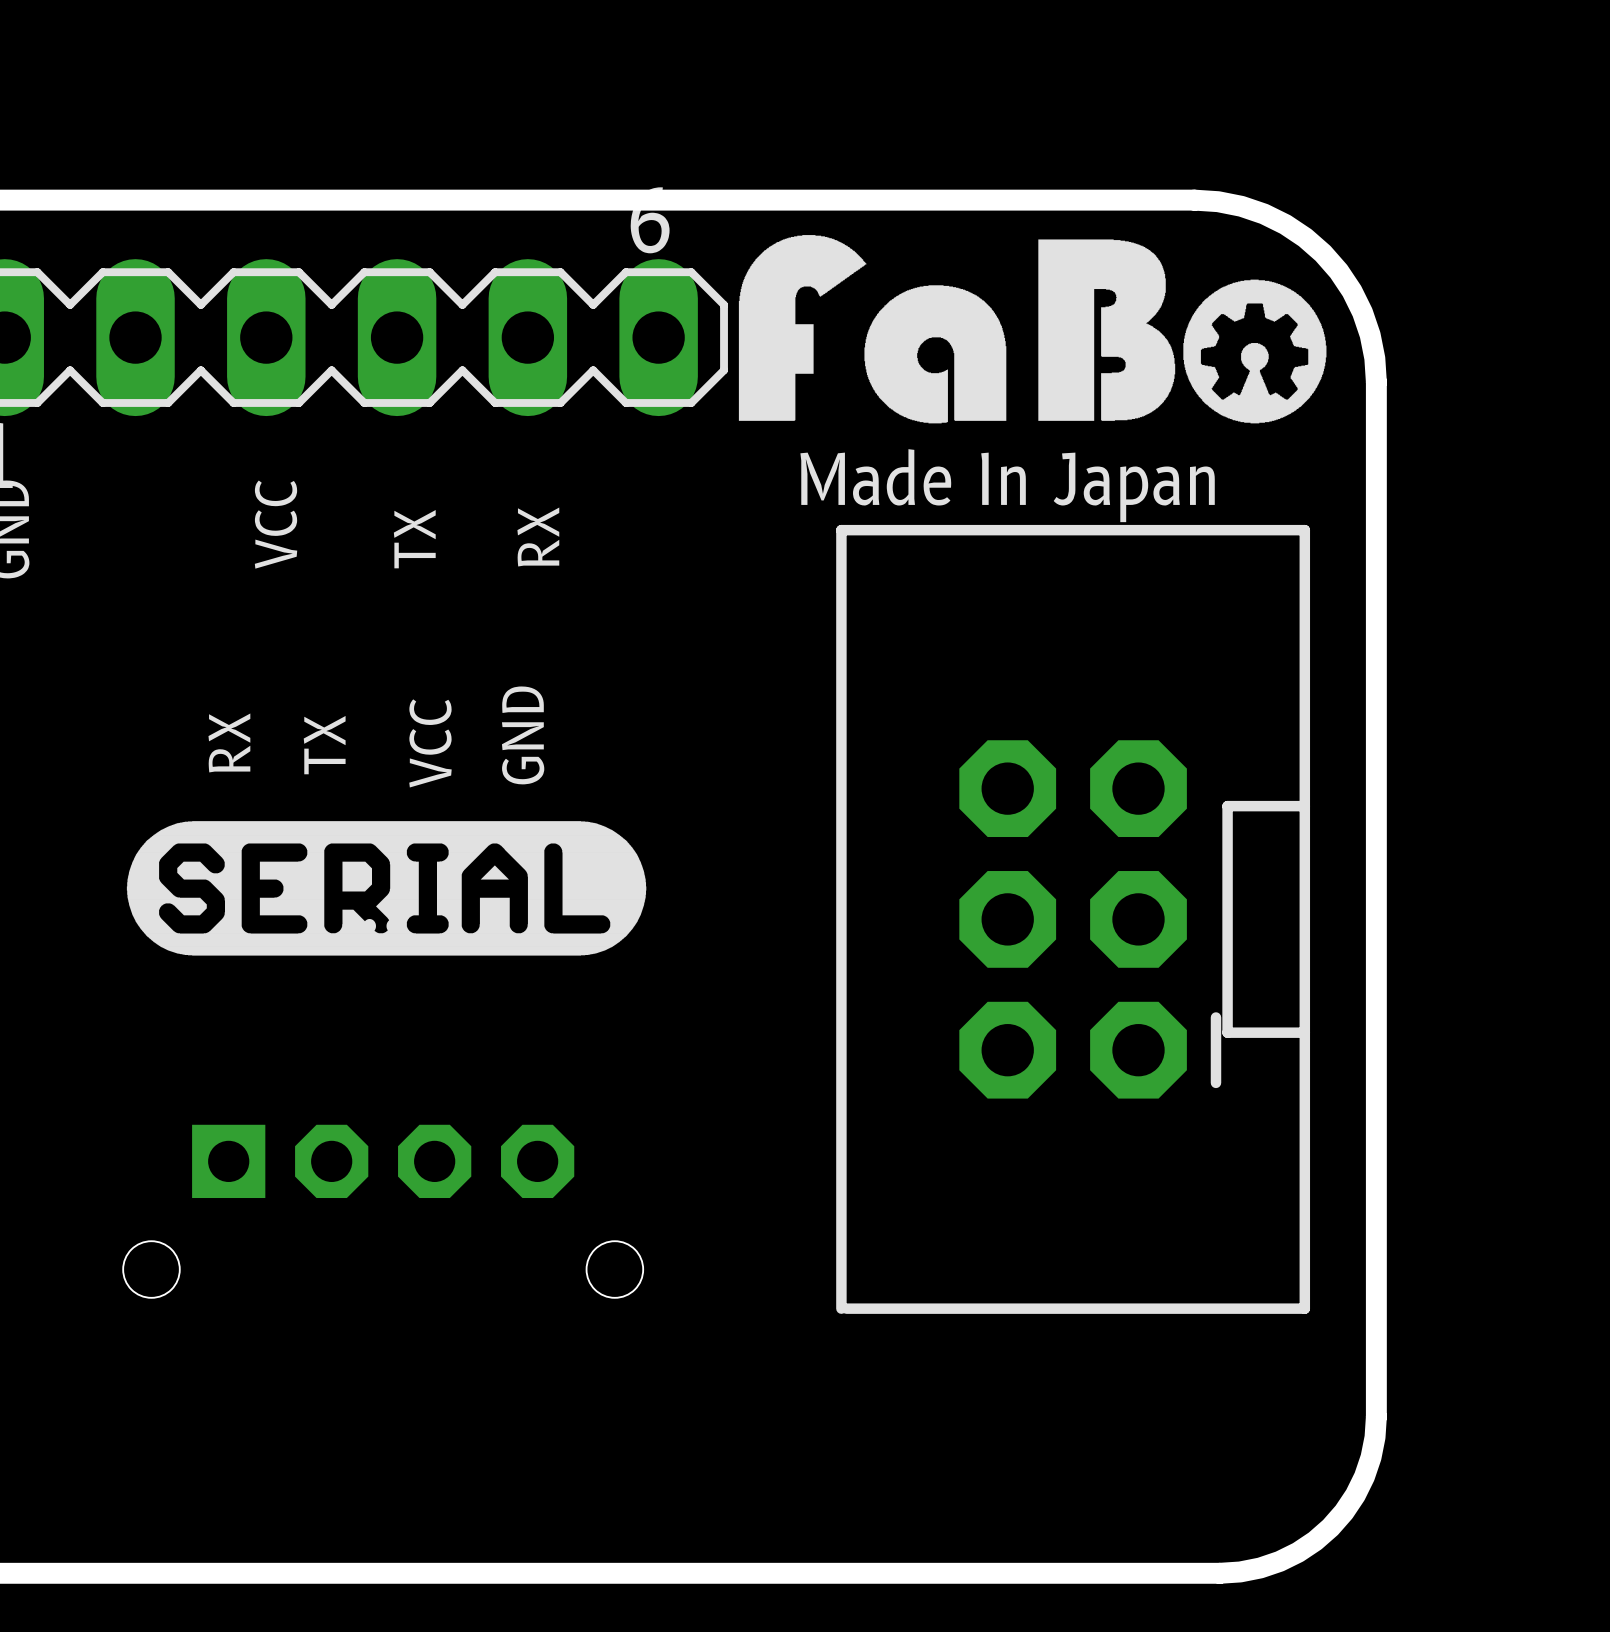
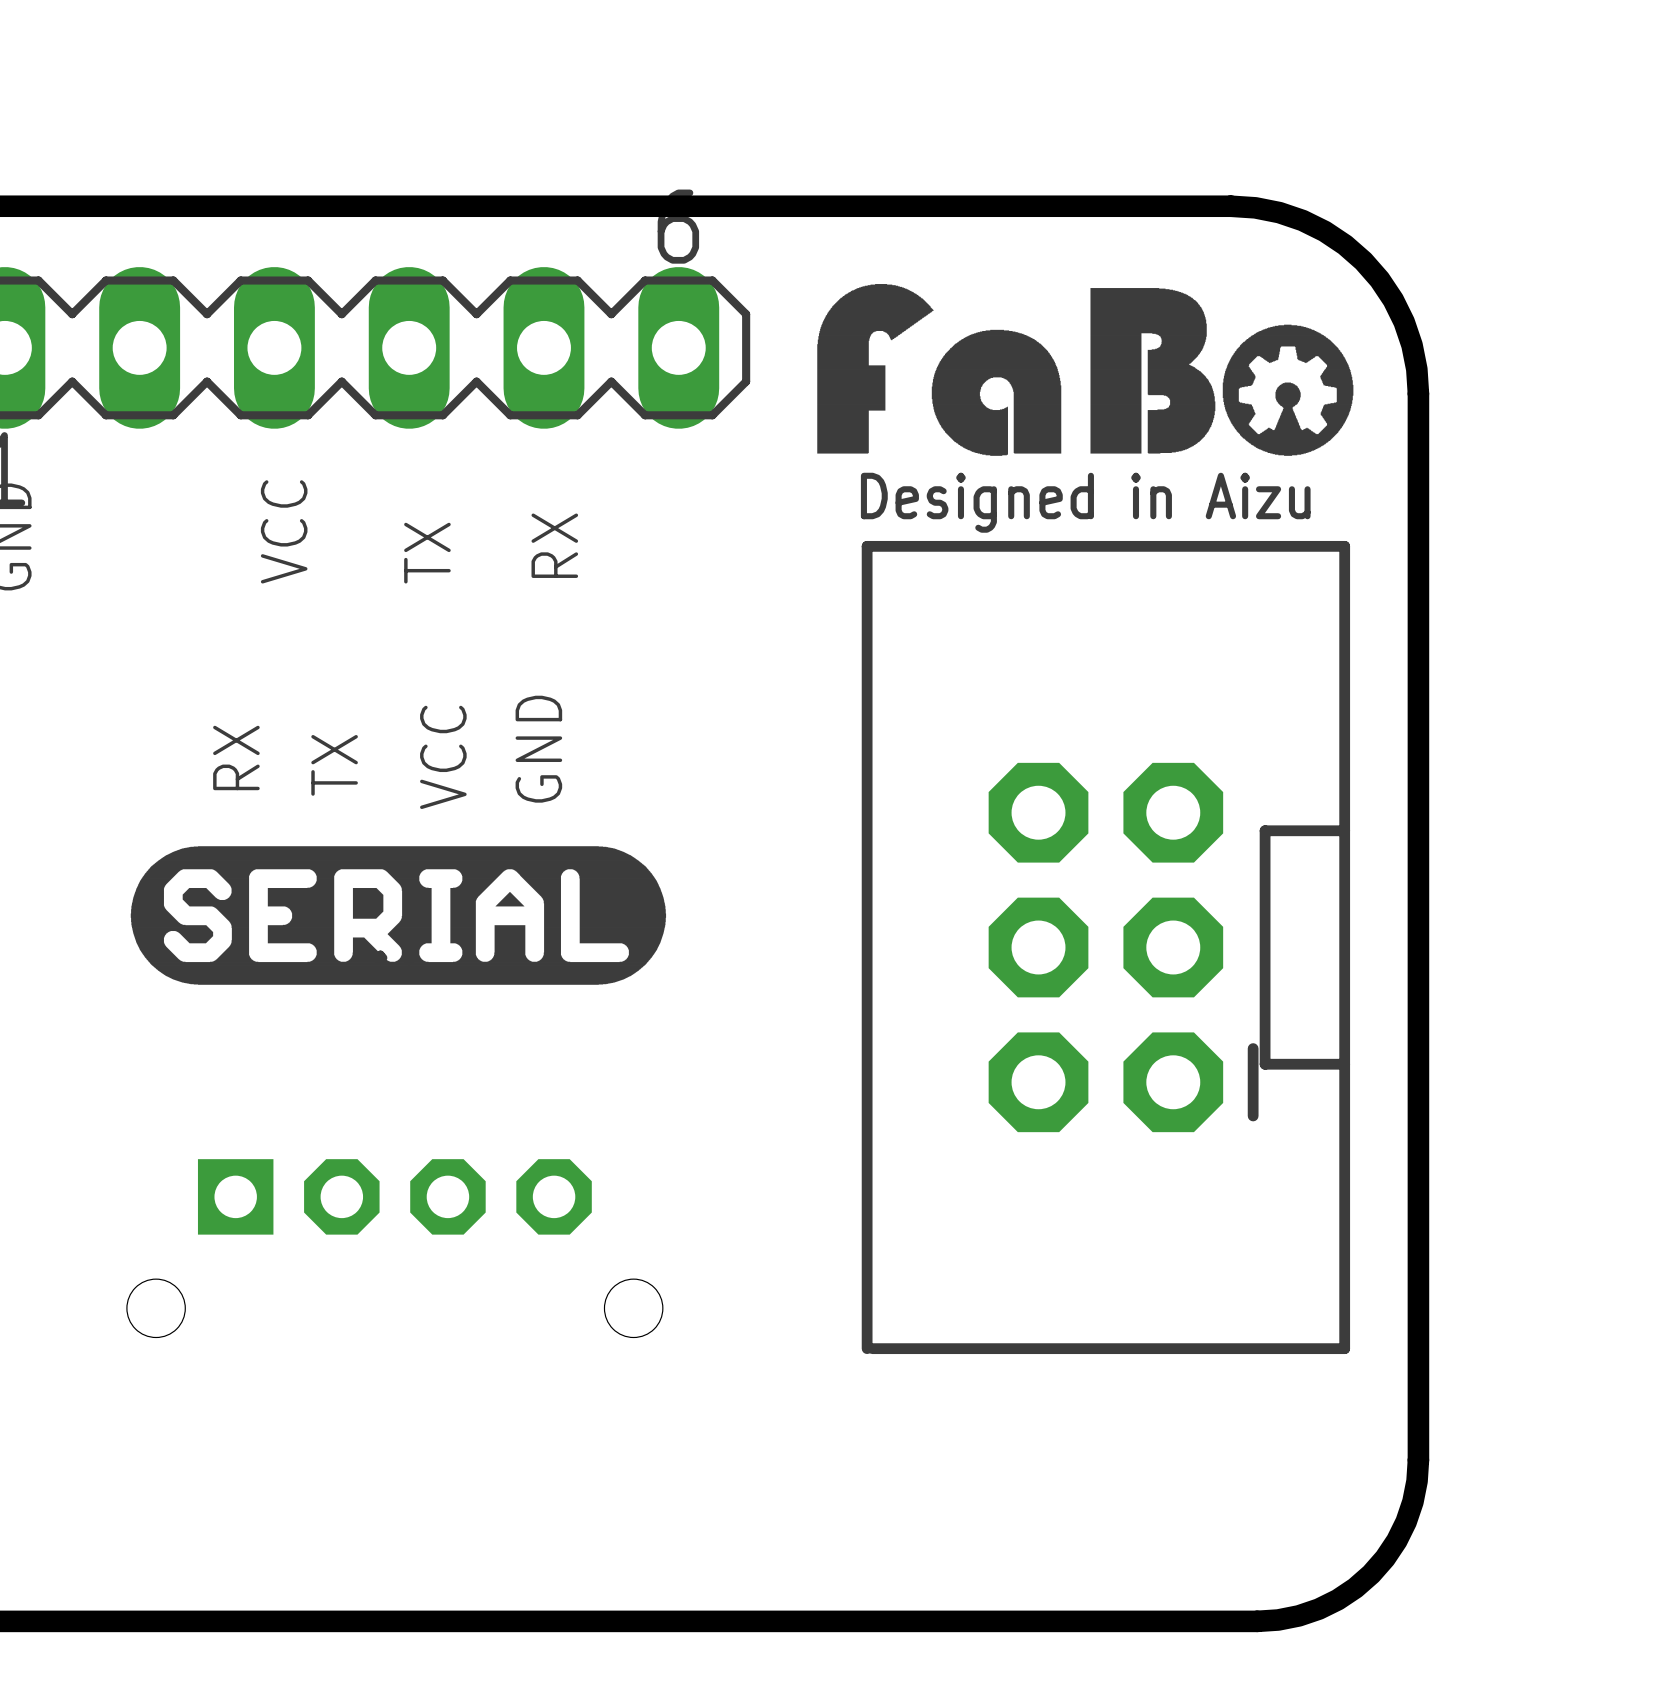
drawing shape: [738, 235, 1327, 424] -> [817, 284, 1354, 456]
text: Made In Japan (1007, 485) -> none
text: none -> Designed in Aizu (1085, 502)

